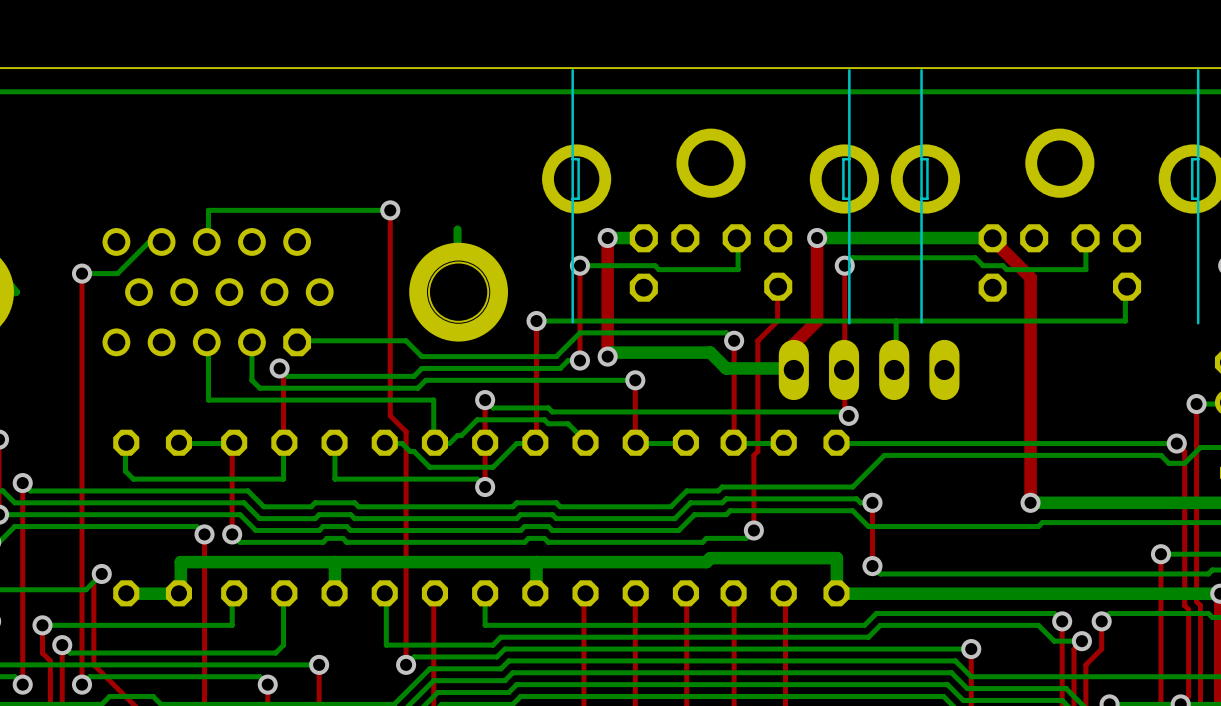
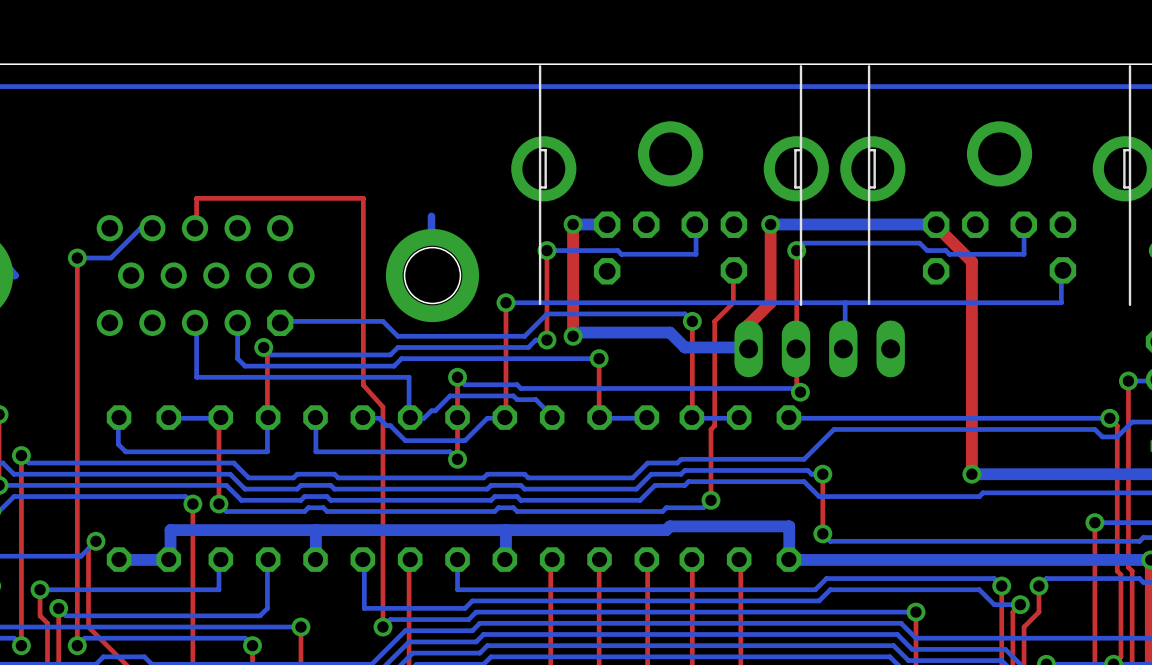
bottom track: (390, 210) (208, 210) (208, 241) (206, 241) -> none
top track: (390, 210) (390, 415) (406, 431) -> (195, 228) (196, 228) (196, 198) (363, 198) (363, 385) (382, 407)
via: (390, 210) -> none

